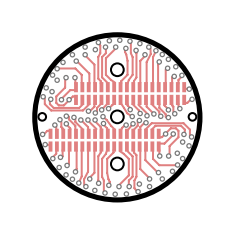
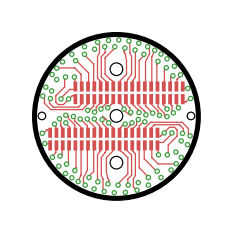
via: none -> (124, 109)
via: (130, 109) -> none
via: none -> (130, 112)
via: (102, 116) -> none
via: (132, 116) -> none
via: none -> (102, 119)
via: (103, 123) -> none
via: none -> (108, 122)

